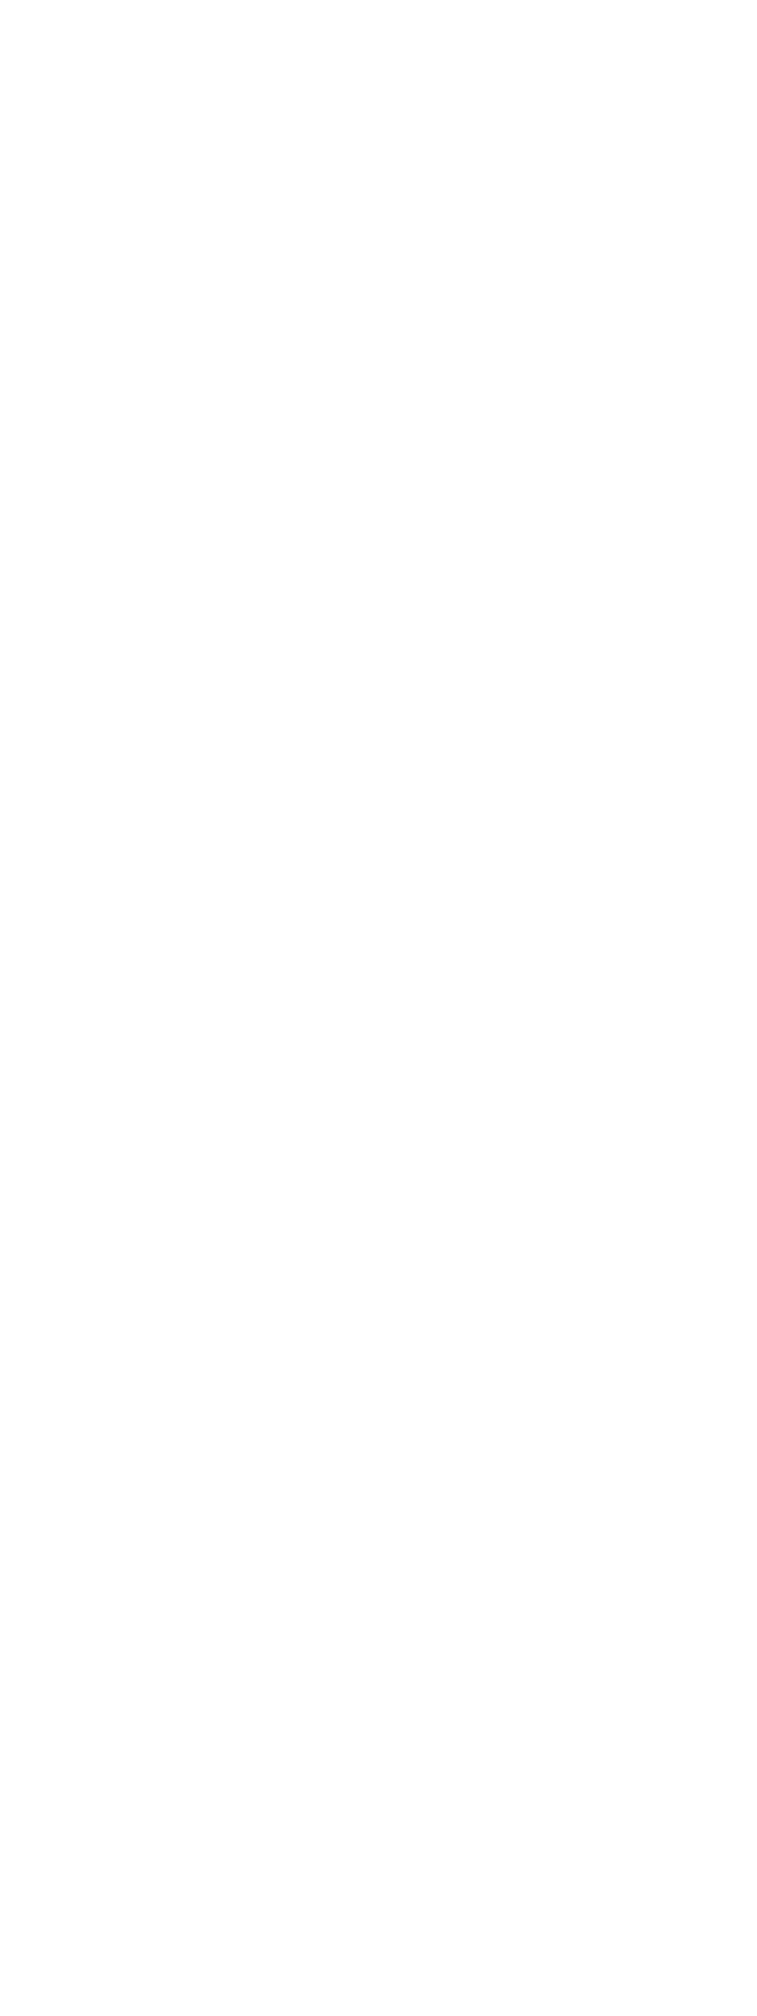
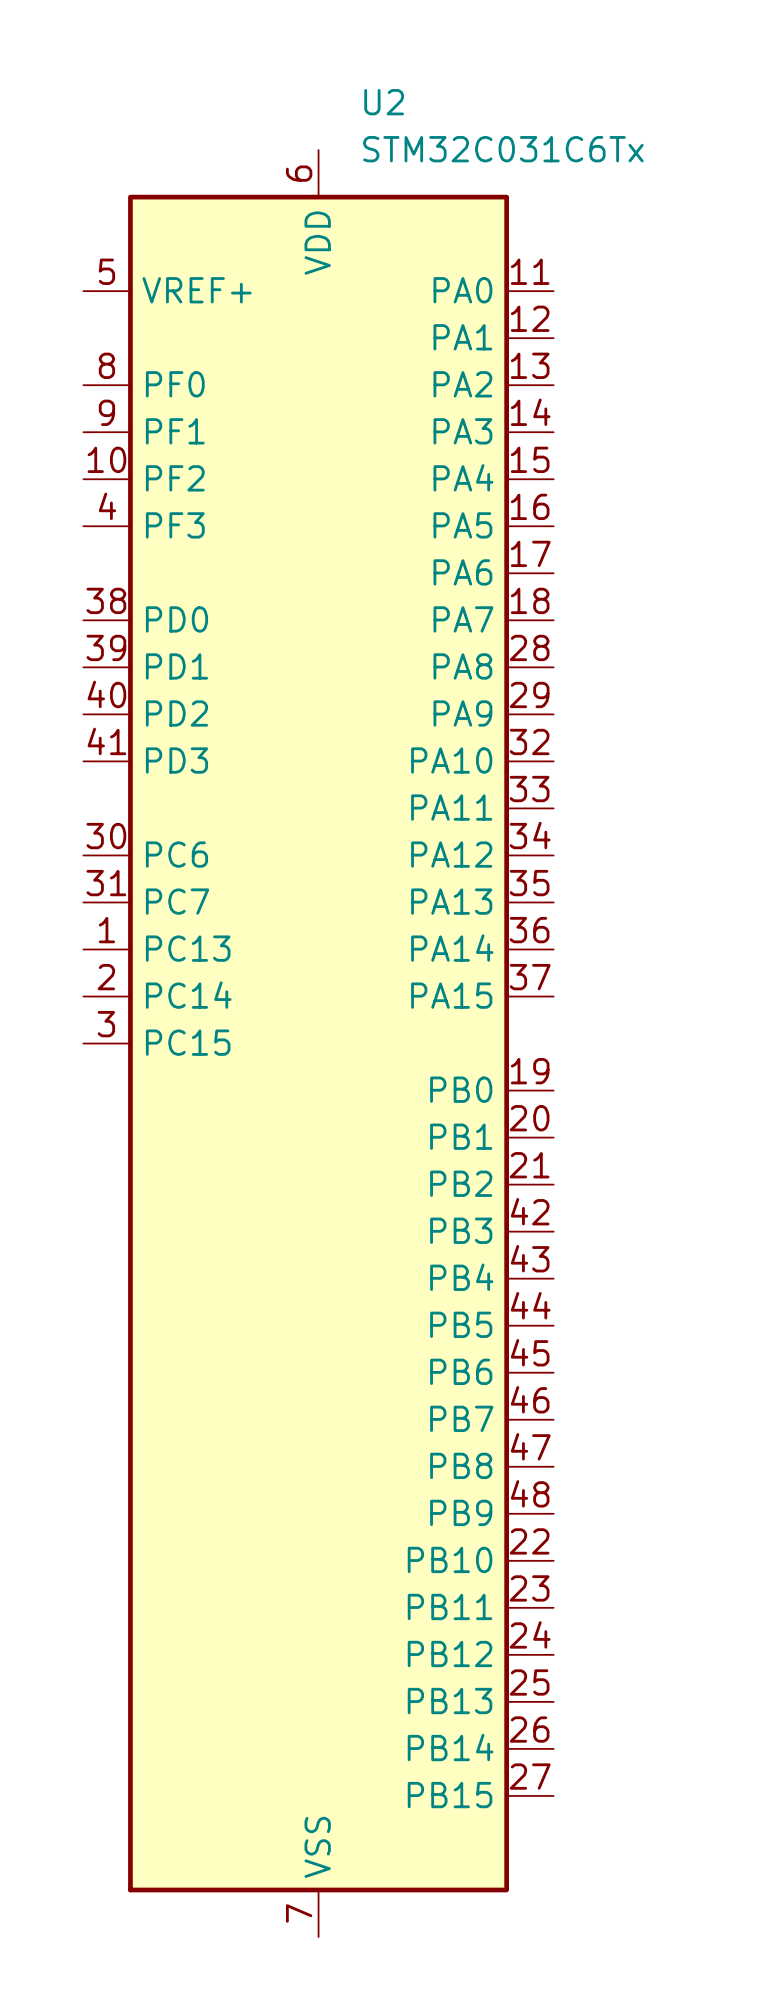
U2: none -> STM32C031C6Tx (318, 1043)

